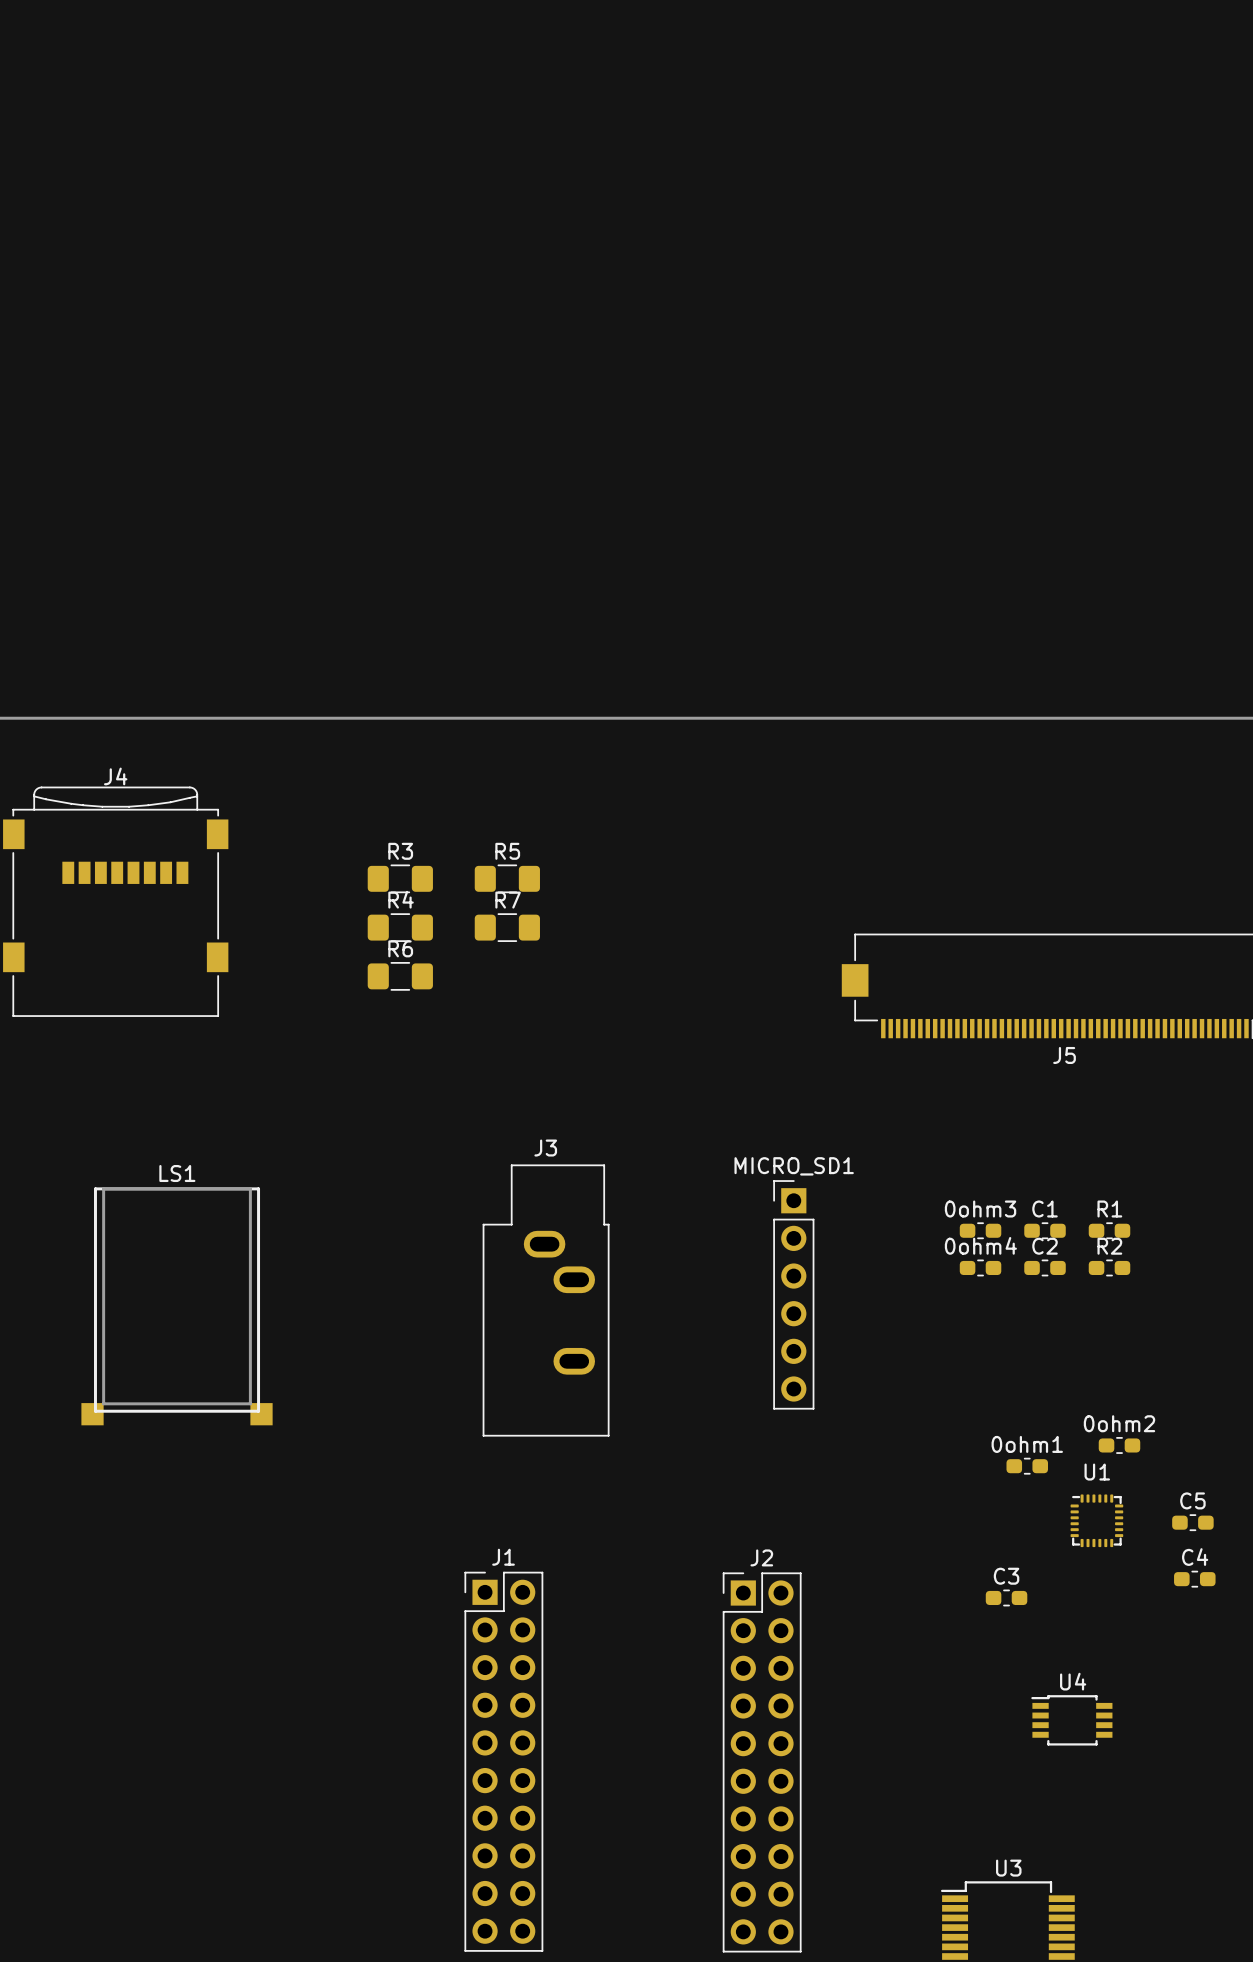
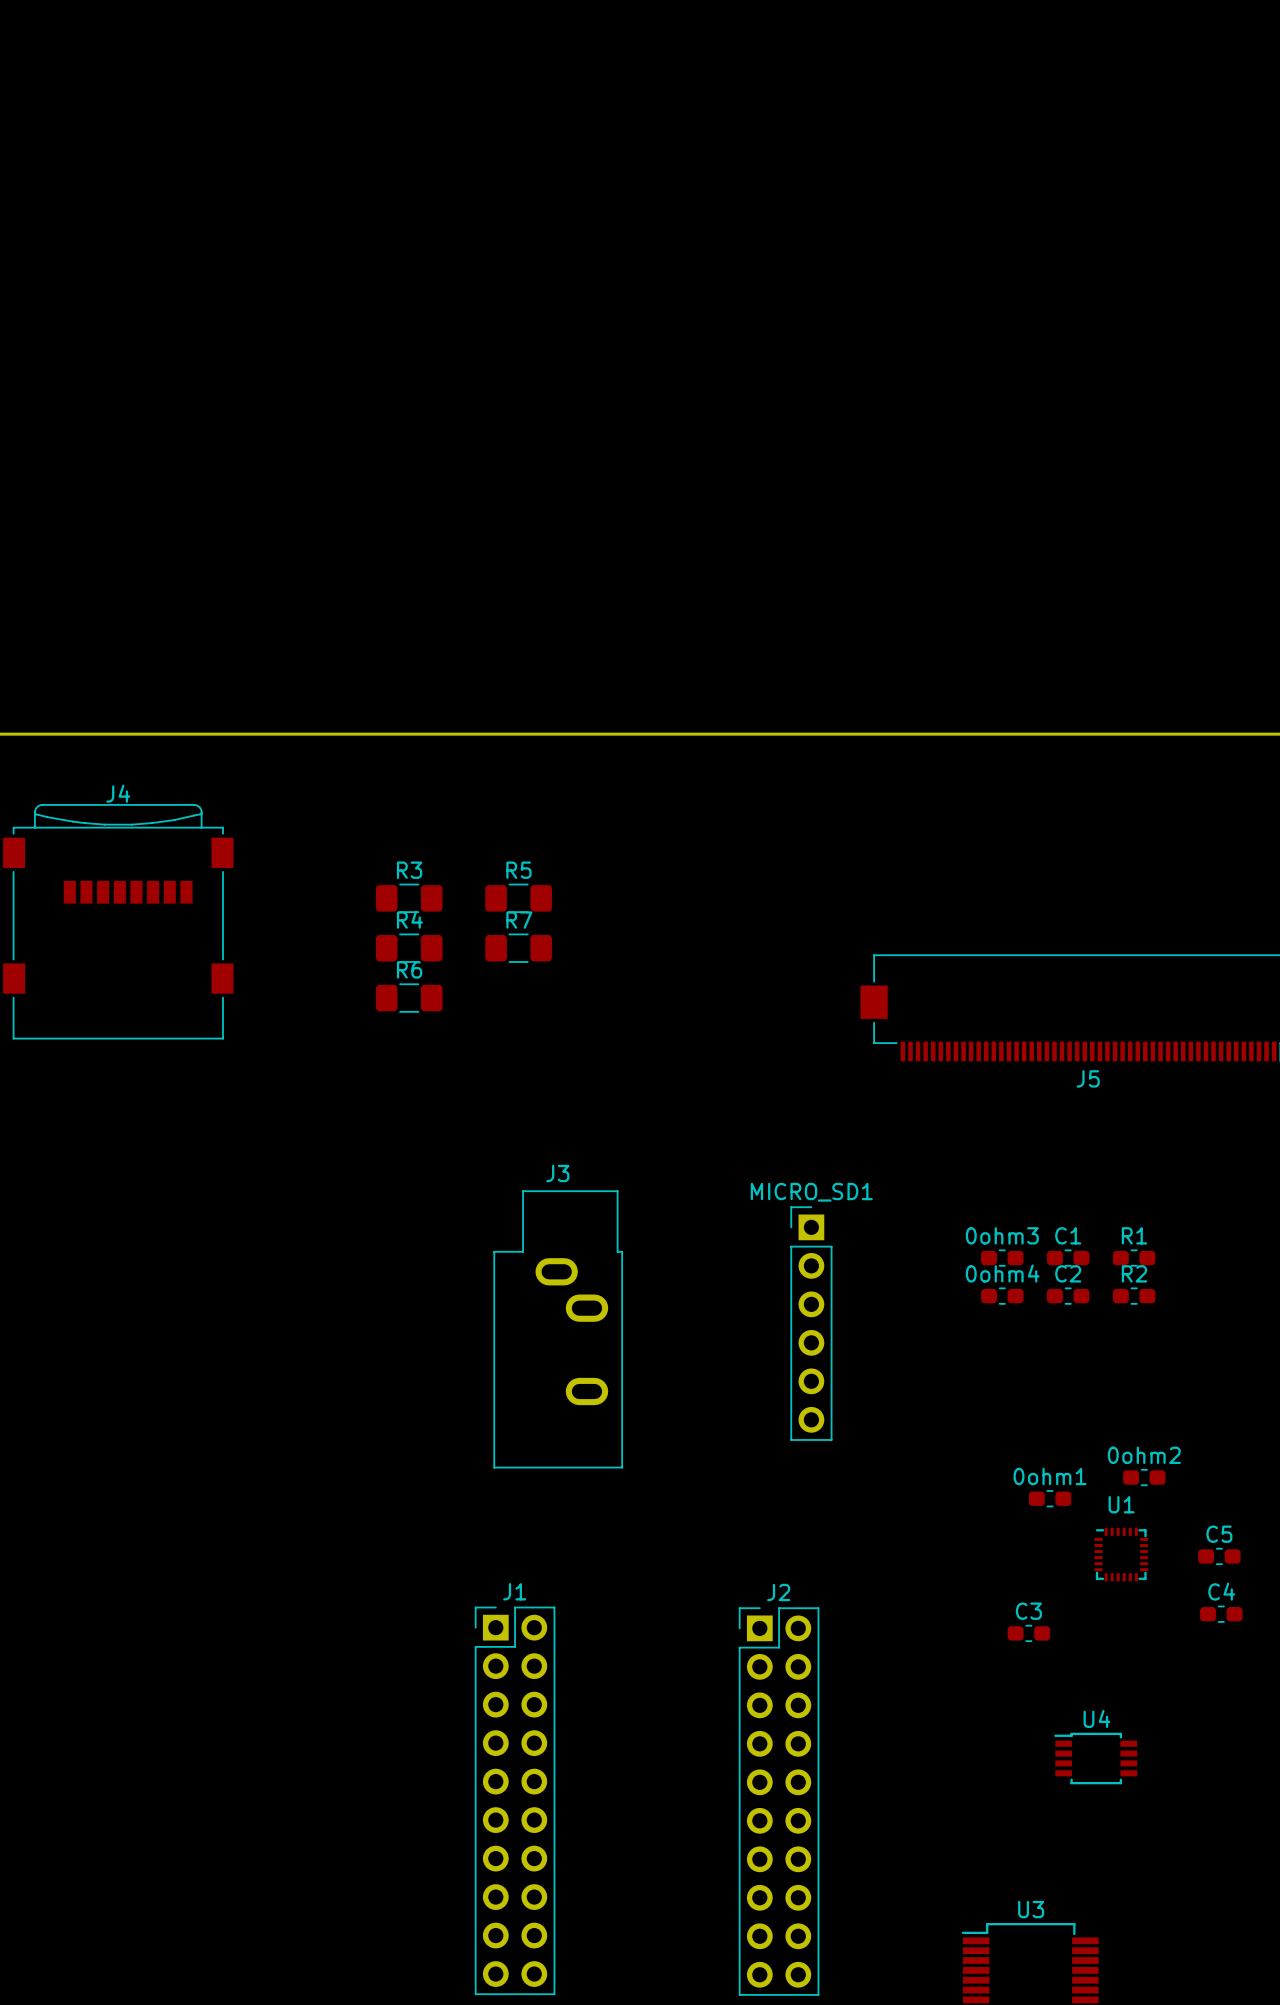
LS1: (177, 1306) -> none

